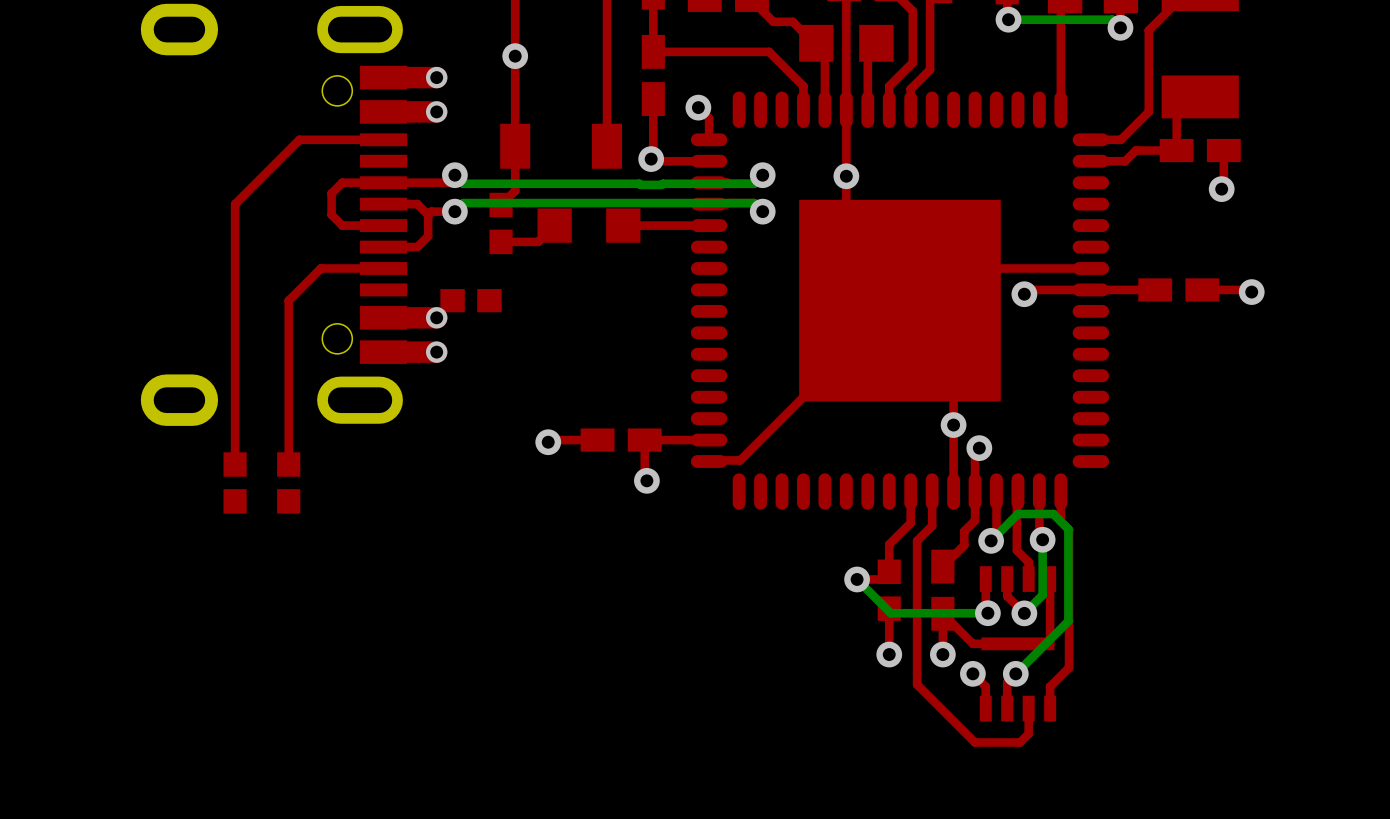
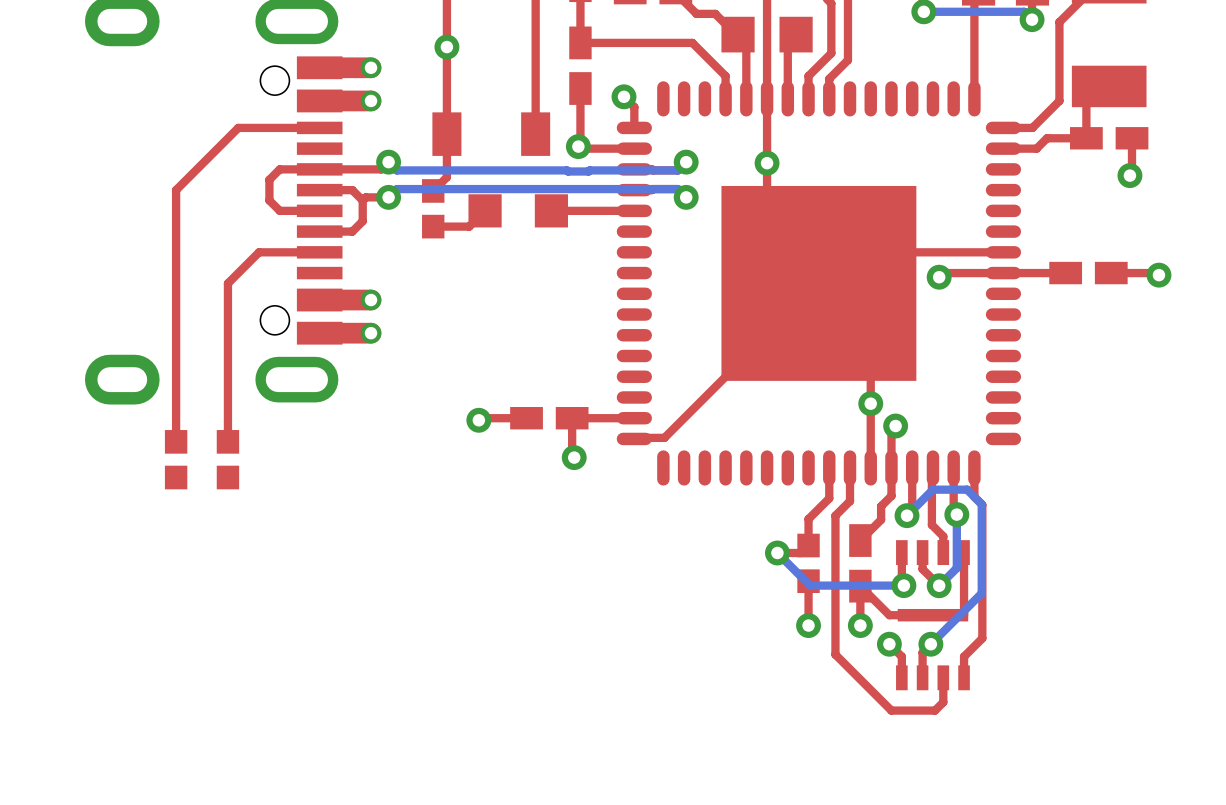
part: (471, 300) -> none

